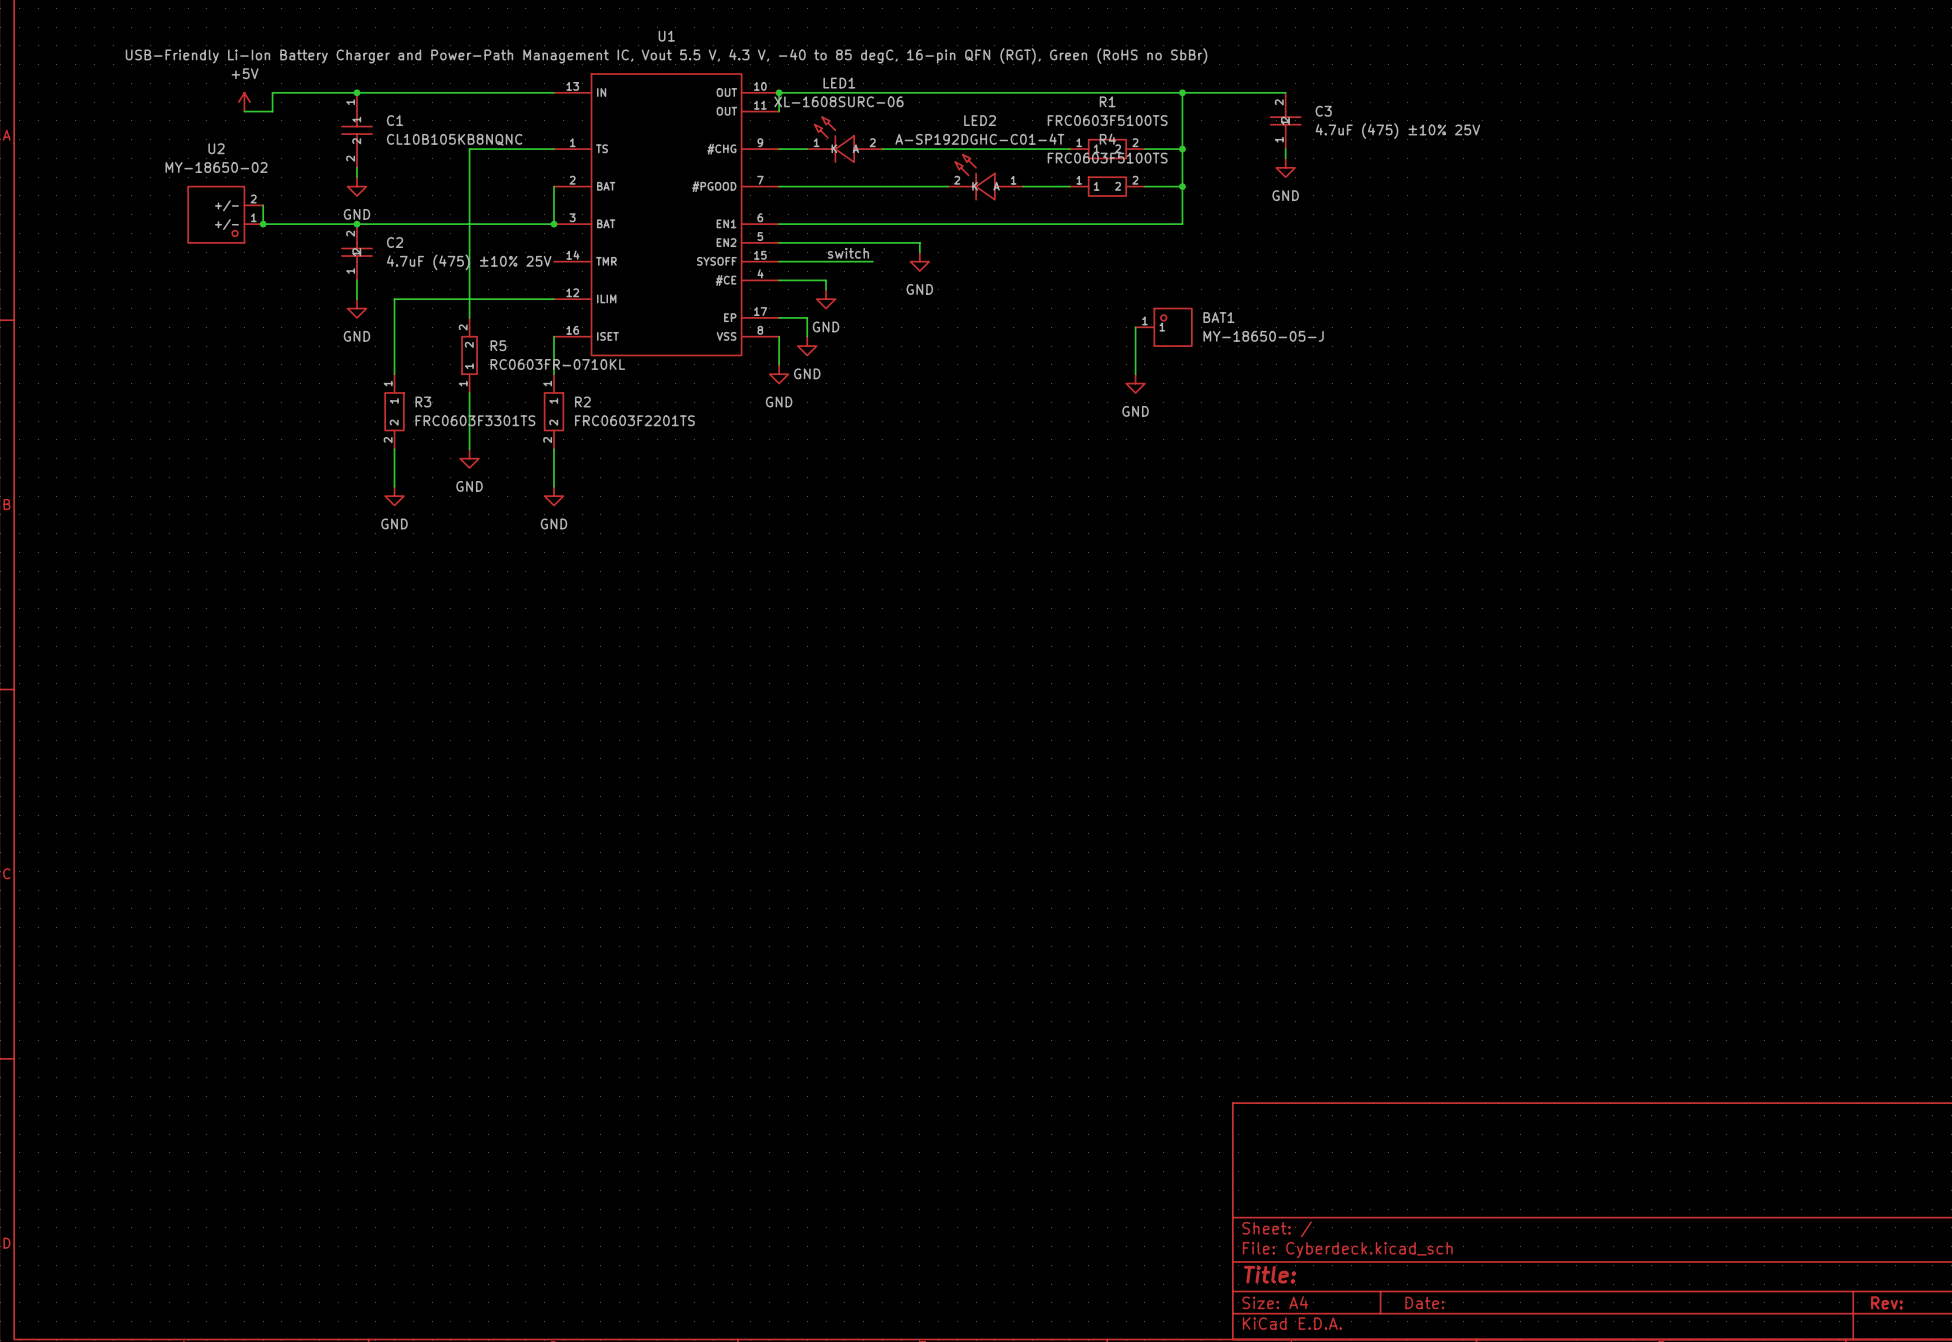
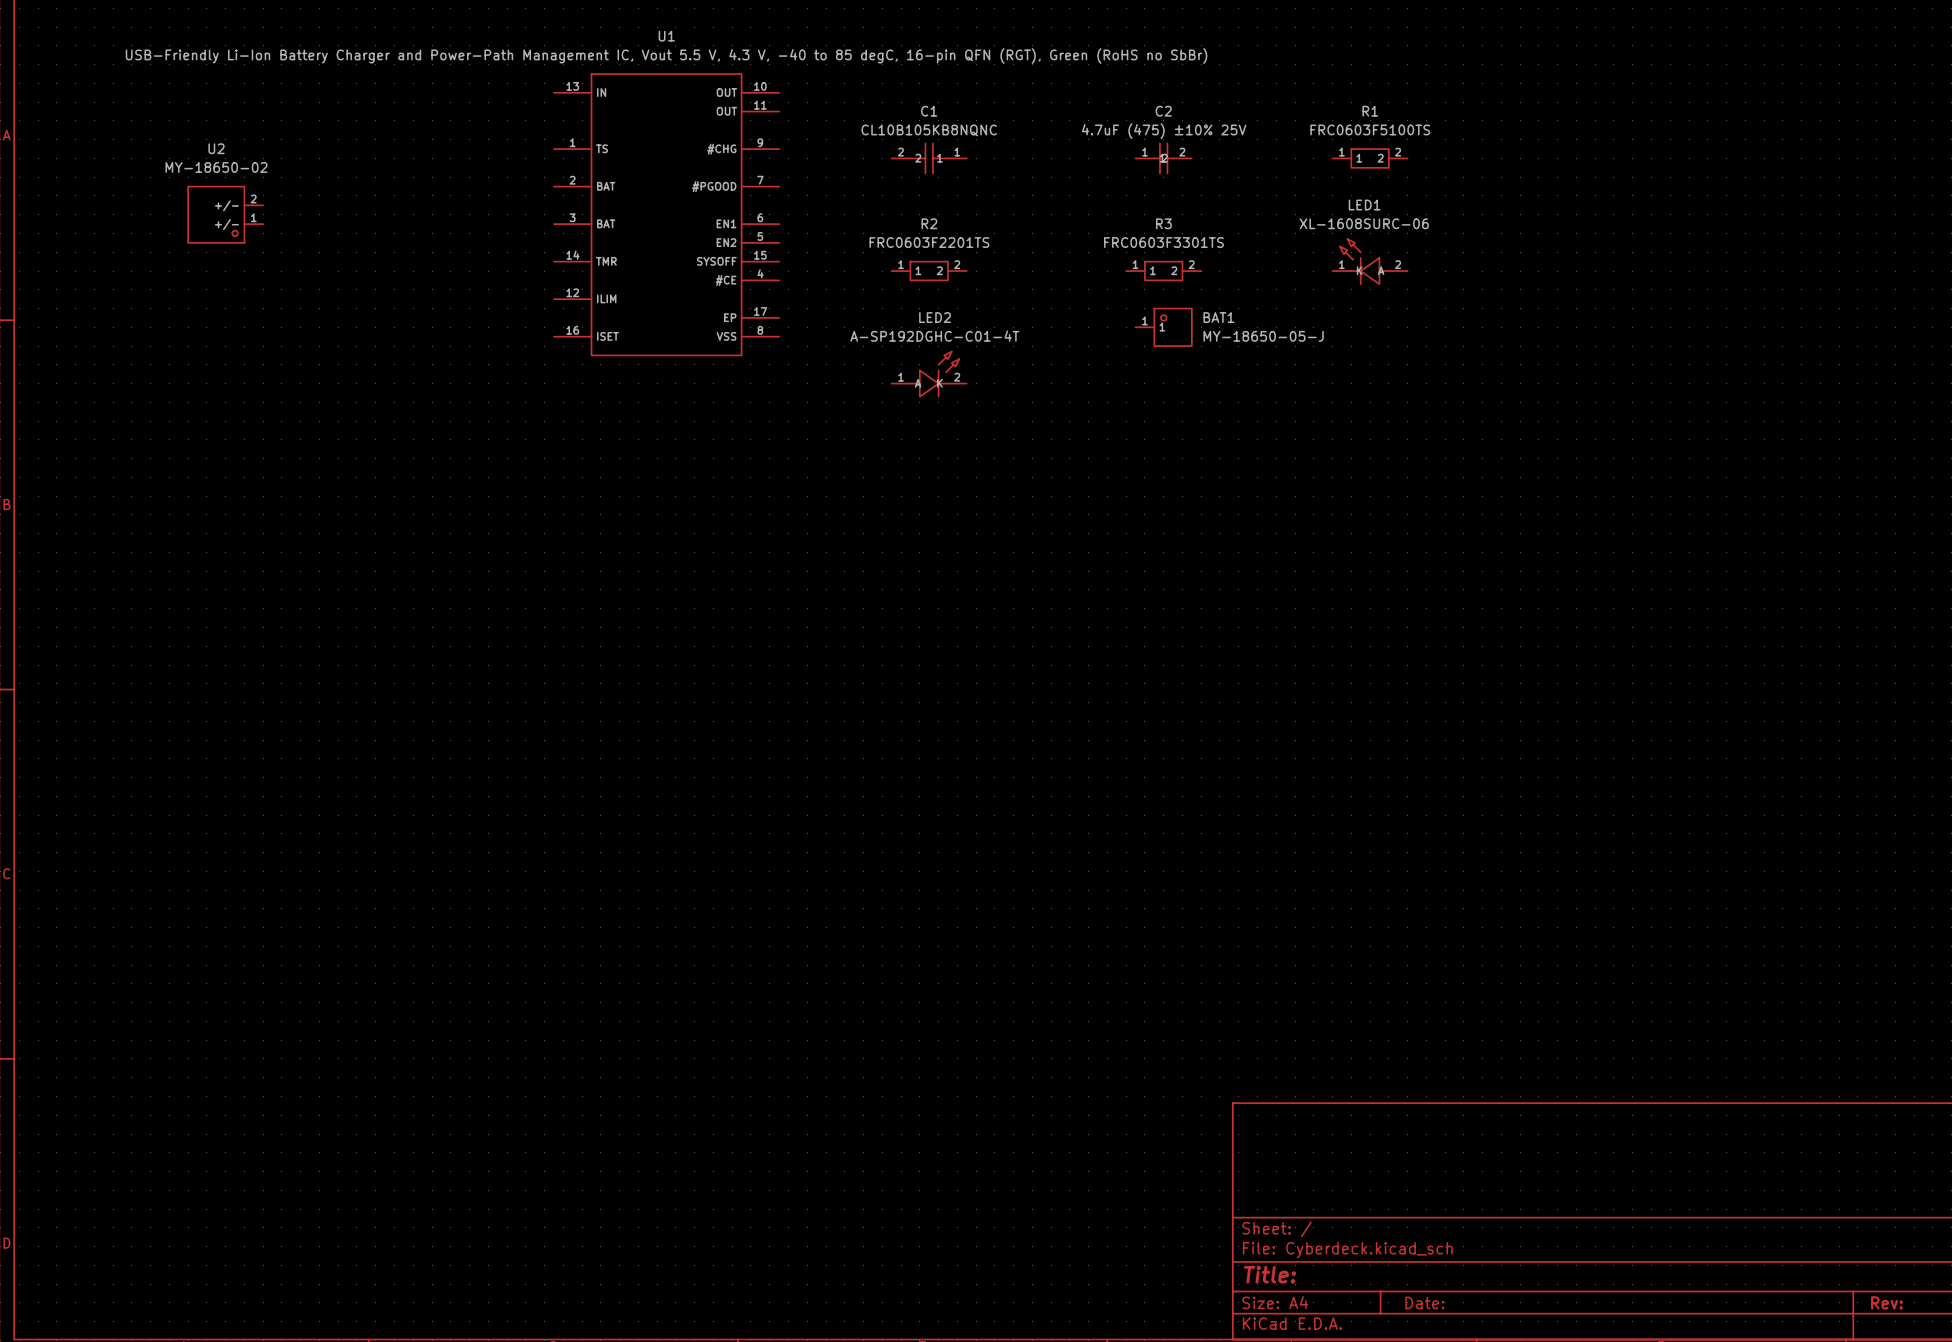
junction: (356, 92) -> none
wire: (553, 92) (272, 92) (272, 111) (244, 111) -> none
junction: (779, 92) -> none
wire: (1182, 92) (1182, 224) (779, 224) -> none
junction: (1182, 92) -> none
wire: (1285, 92) (779, 92) (779, 111) -> none
power symbol: +5V (244, 102) -> none
C1 name position: C1 (395, 120) -> C1 (929, 111)
C3: 4.7uF (475) ±10% 25V (1285, 120) -> none
C1 rotation: 0° (356, 130) -> 90° clockwise (929, 158)
C1 position: (356, 130) -> (929, 158)
C1 value position: CL10B105KB8NQNC (454, 139) -> CL10B105KB8NQNC (929, 130)
LED1 position: (844, 139) -> (1370, 261)
wire: (553, 149) (469, 149) (469, 317) -> none
wire: (779, 149) (807, 149) -> none
wire: (882, 149) (1069, 149) -> none
R1 position: (1107, 149) -> (1370, 158)
wire: (1144, 149) (1182, 149) -> none
junction: (1182, 149) -> none
wire: (1285, 149) (1285, 158) -> none
wire: (356, 167) (356, 177) -> none
power symbol: GND (1285, 167) -> none
LED2 flip: as is (979, 177) -> left-right (934, 374)
LED2 position: (985, 177) -> (929, 374)
power symbol: GND (356, 186) -> none
wire: (553, 186) (553, 224) (263, 224) (263, 205) -> none
wire: (779, 186) (947, 186) -> none
wire: (1023, 186) (1069, 186) -> none
R4: FRC0603F5100TS (1107, 186) -> none
wire: (1144, 186) (1182, 186) -> none
junction: (1182, 186) -> none
junction: (263, 224) -> none
junction: (356, 224) -> none
junction: (553, 224) -> none
C2 name position: C2 (395, 242) -> C2 (1163, 111)
wire: (779, 242) (919, 242) (919, 252) -> none
C2 rotation: 0° (356, 252) -> 90° clockwise (1163, 158)
C2 position: (356, 252) -> (1163, 158)
label: switch (848, 253) -> none
wire: (779, 261) (872, 261) -> none
power symbol: GND (919, 261) -> none
C2 value position: 4.7uF (475) ±10% 25V (469, 262) -> 4.7uF (475) ±10% 25V (1164, 131)
wire: (356, 280) (356, 299) -> none
wire: (779, 280) (826, 280) (826, 289) -> none
wire: (553, 299) (394, 299) (394, 374) -> none
power symbol: GND (826, 299) -> none
power symbol: GND (356, 308) -> none
wire: (779, 317) (807, 317) (807, 336) -> none
wire: (1135, 327) (1135, 374) -> none
wire: (553, 336) (553, 374) -> none
wire: (779, 336) (779, 364) -> none
power symbol: GND (807, 346) -> none
R5: RC0603FR-0710KL (469, 355) -> none
power symbol: GND (779, 374) -> none
power symbol: GND (1135, 383) -> none
wire: (469, 392) (469, 449) -> none
R3 name position: R3 (423, 402) -> R3 (1163, 223)
R2 name position: R2 (582, 402) -> R2 (929, 223)
R3 rotation: 0° (394, 411) -> 90° counterclockwise (1163, 271)
R3 position: (394, 411) -> (1163, 271)
R2 rotation: 0° (553, 411) -> 90° counterclockwise (929, 271)
R2 position: (553, 411) -> (929, 271)
R3 value position: FRC0603F3301TS (475, 420) -> FRC0603F3301TS (1163, 242)
R2 value position: FRC0603F2201TS (634, 420) -> FRC0603F2201TS (929, 242)
wire: (394, 449) (394, 486) -> none
wire: (553, 449) (553, 486) -> none
power symbol: GND (469, 458) -> none
power symbol: GND (394, 496) -> none
power symbol: GND (553, 496) -> none

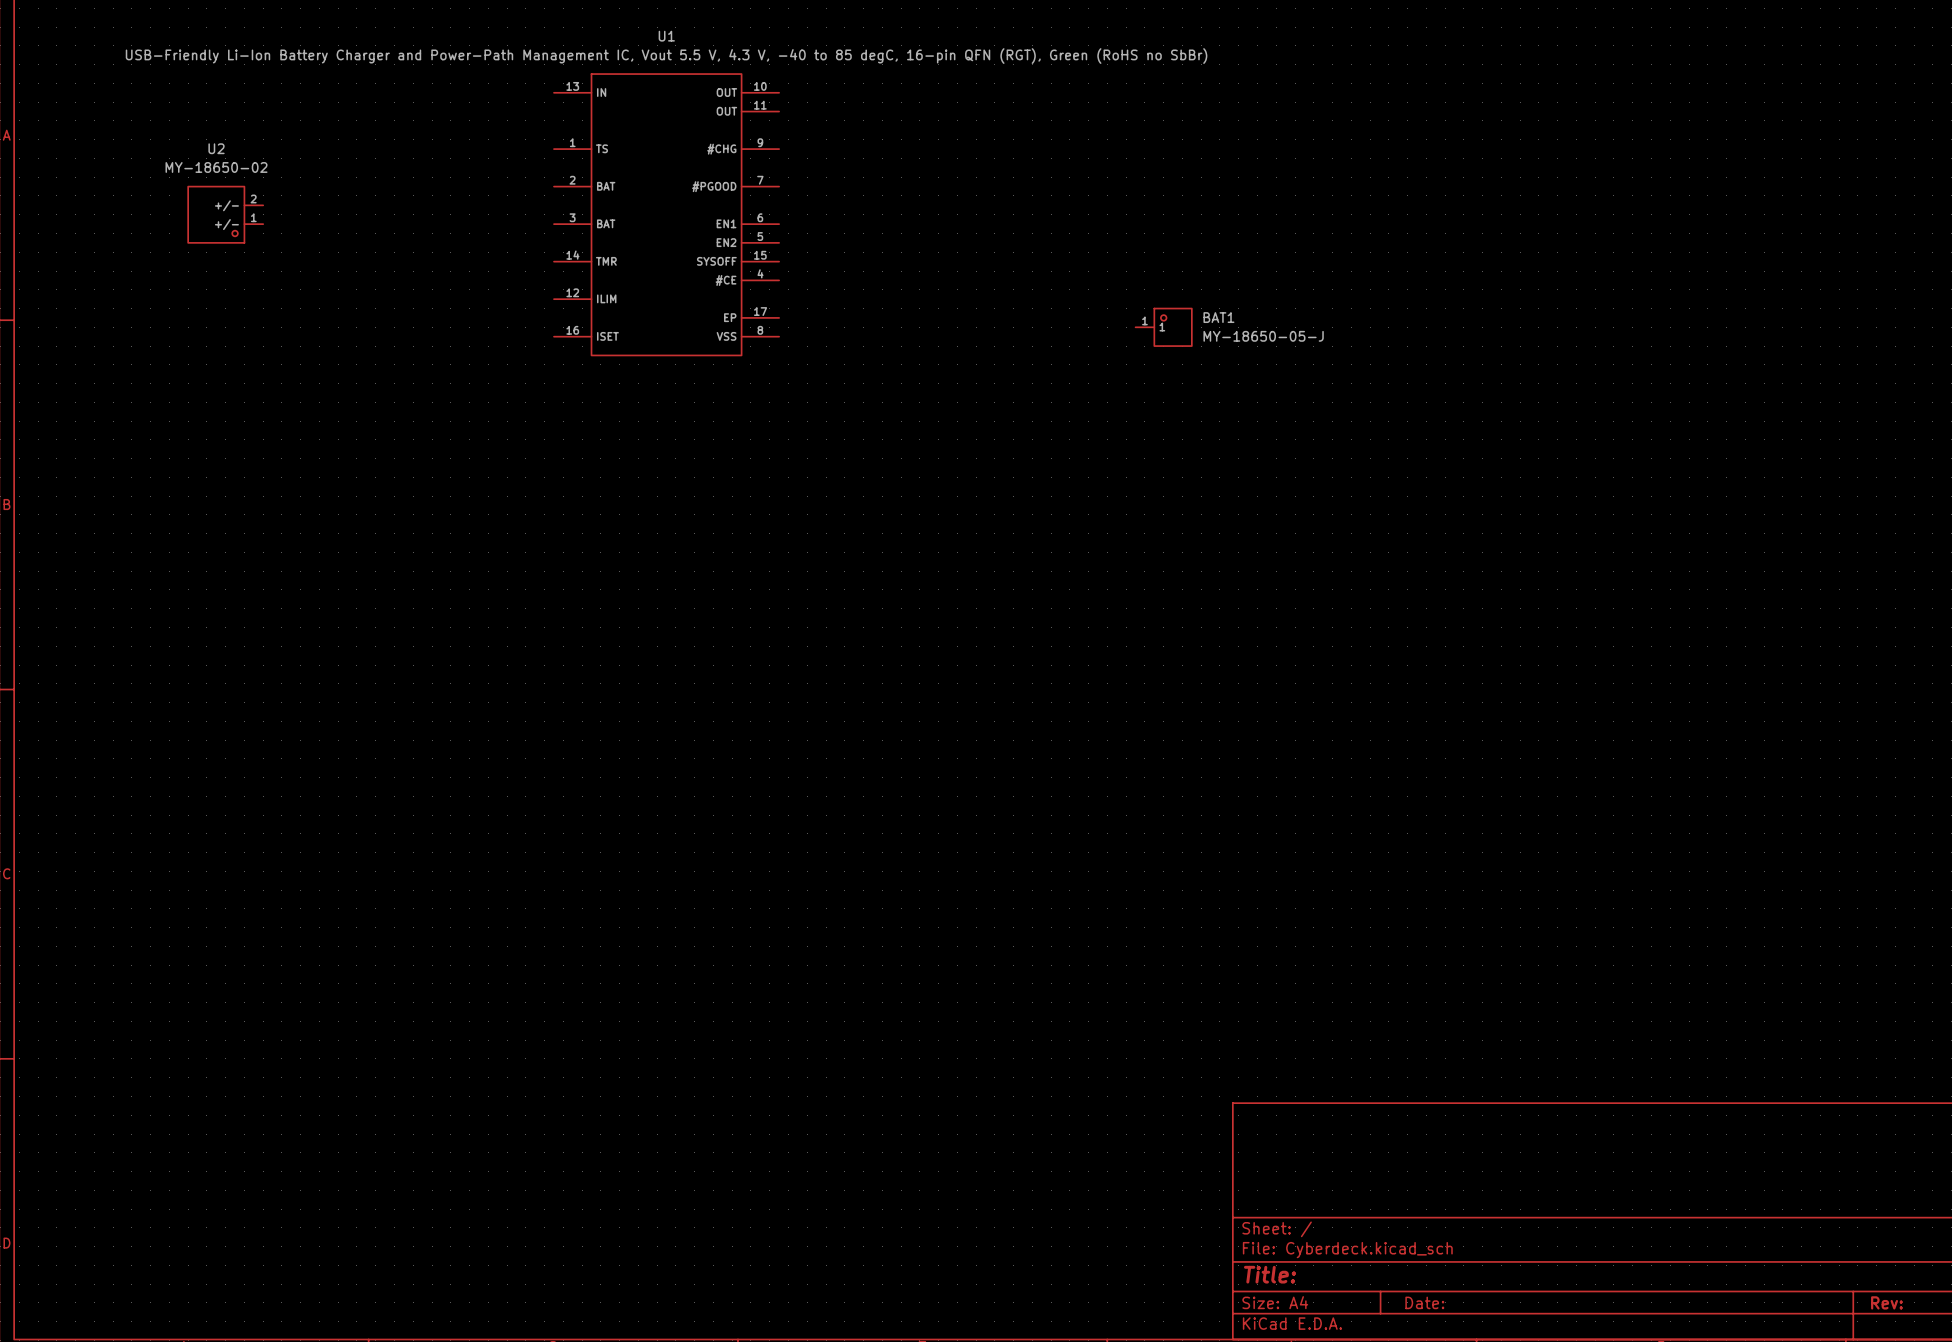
C1: CL10B105KB8NQNC (929, 158) -> none
C2: 4.7uF (475) ±10% 25V (1163, 158) -> none
R1: FRC0603F5100TS (1370, 158) -> none
LED1: XL-1608SURC-06 (1370, 261) -> none
R2: FRC0603F2201TS (929, 271) -> none
R3: FRC0603F3301TS (1163, 271) -> none
LED2: A-SP192DGHC-C01-4T (929, 374) -> none

